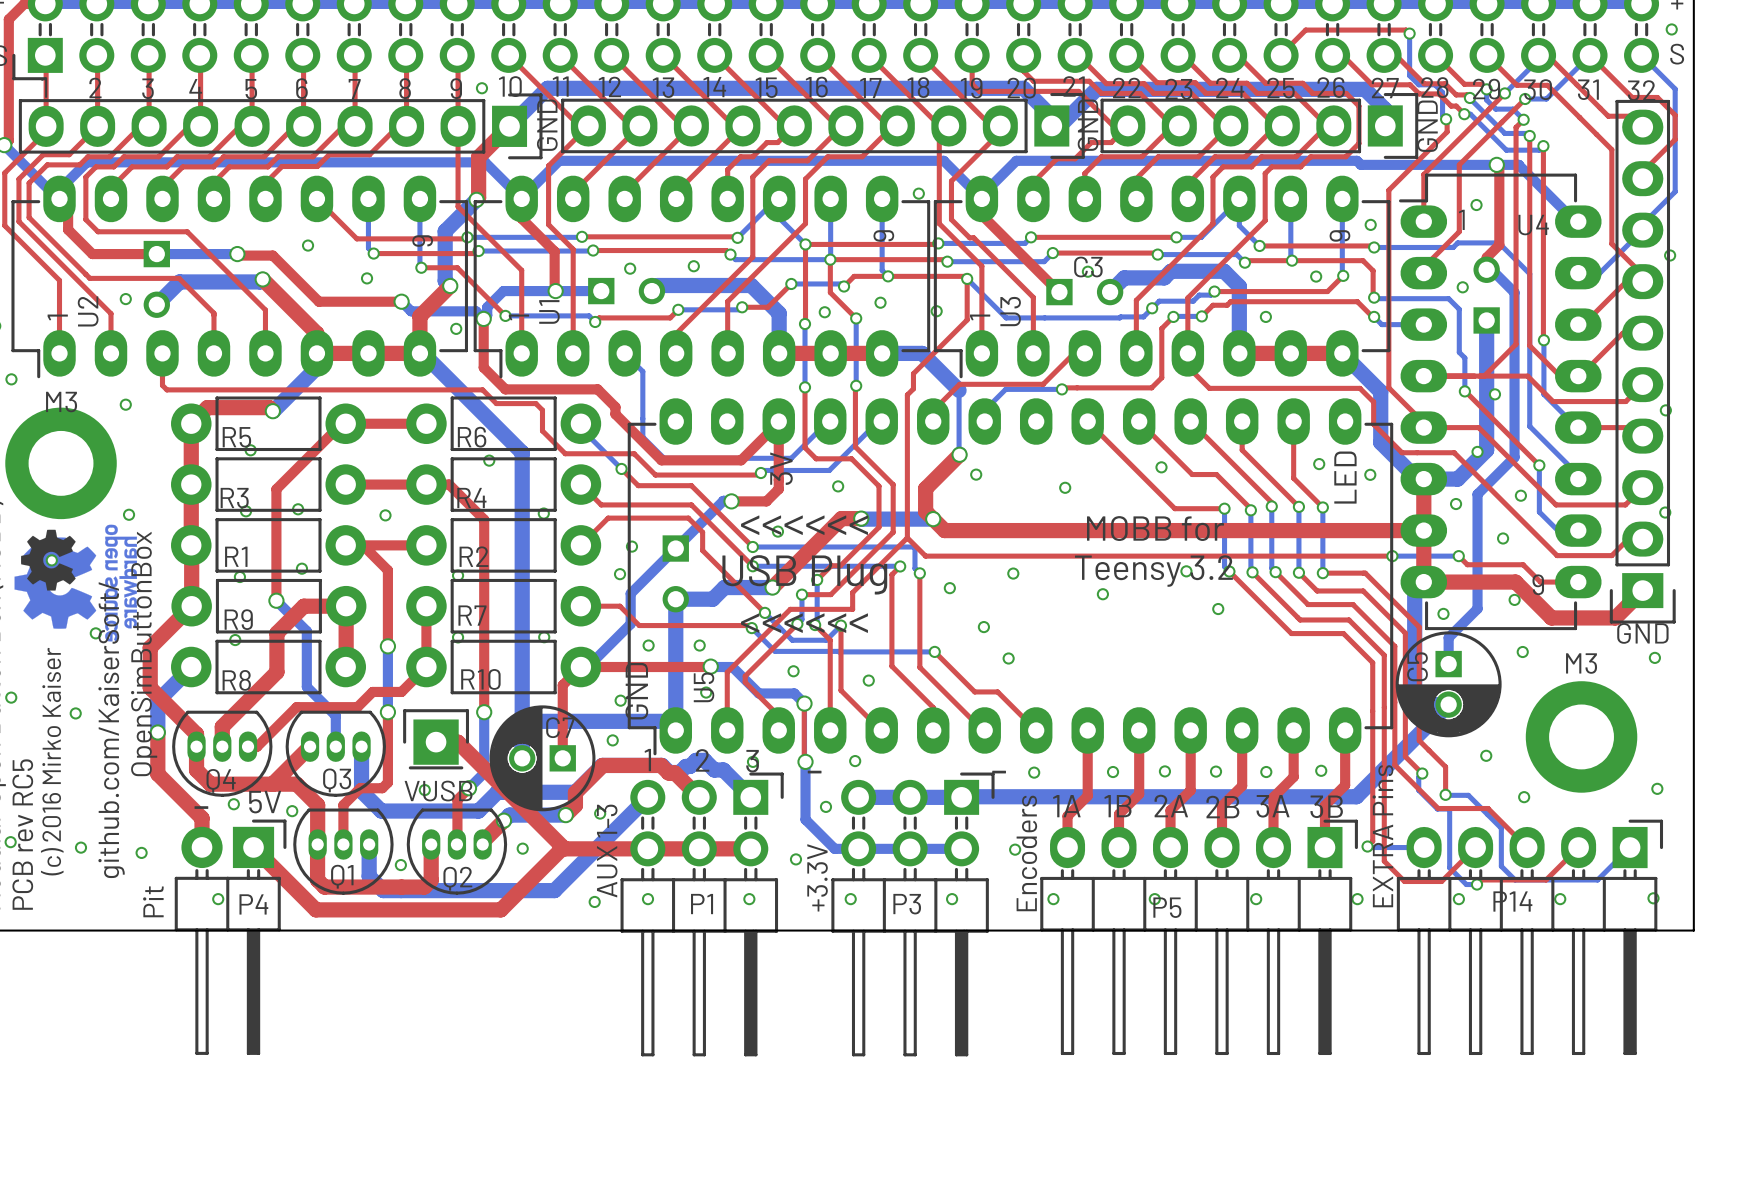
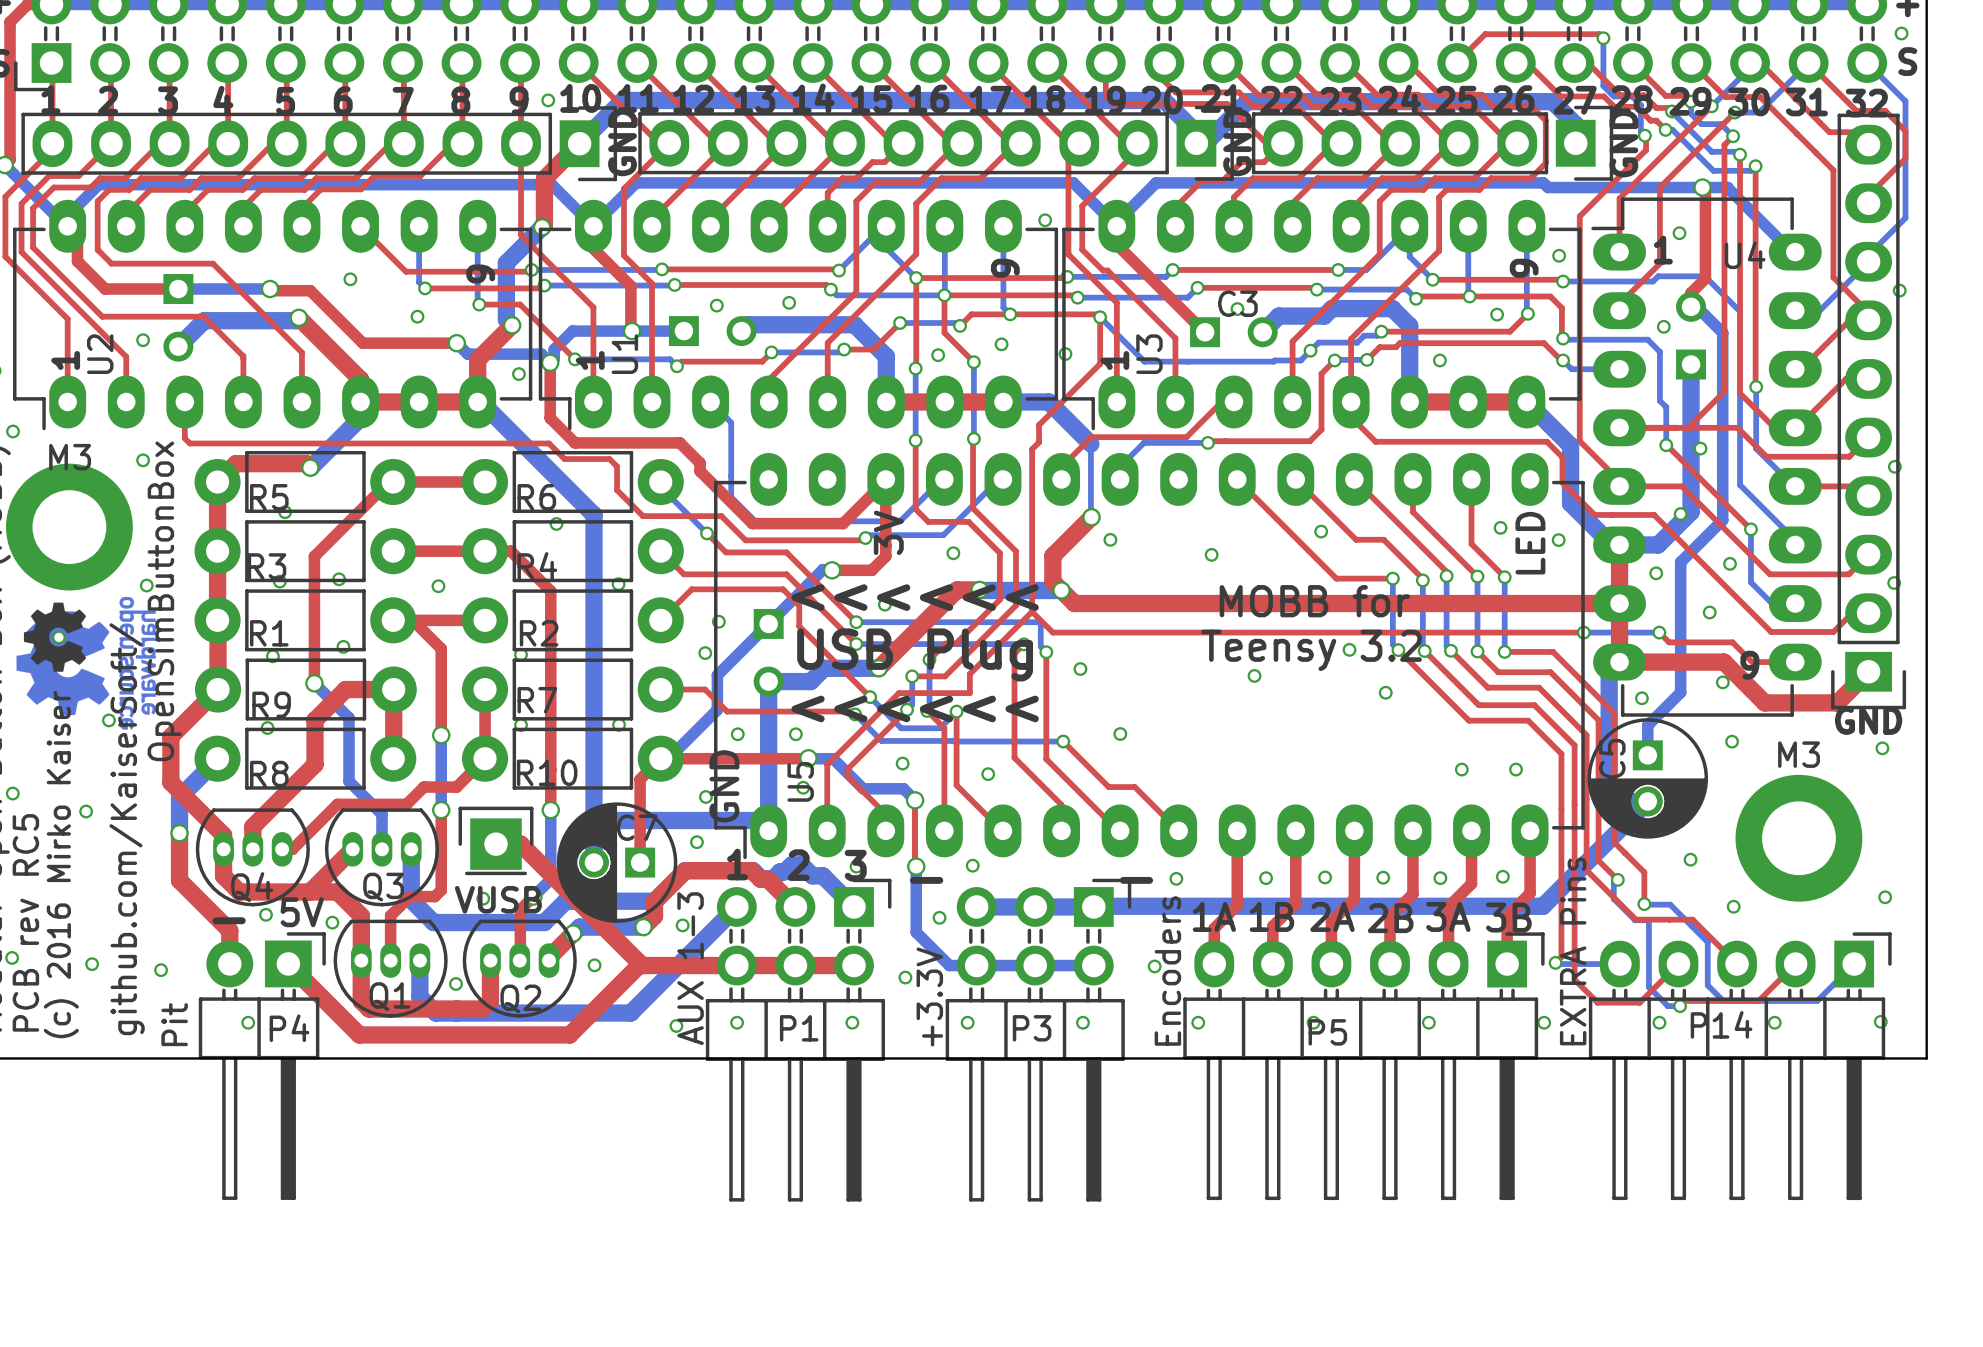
part: (1013, 573) -> none
part: (983, 627) -> none
part: none -> (1120, 734)
part: (1008, 658) -> none
part: none -> (1461, 769)
part: none -> (1516, 769)

